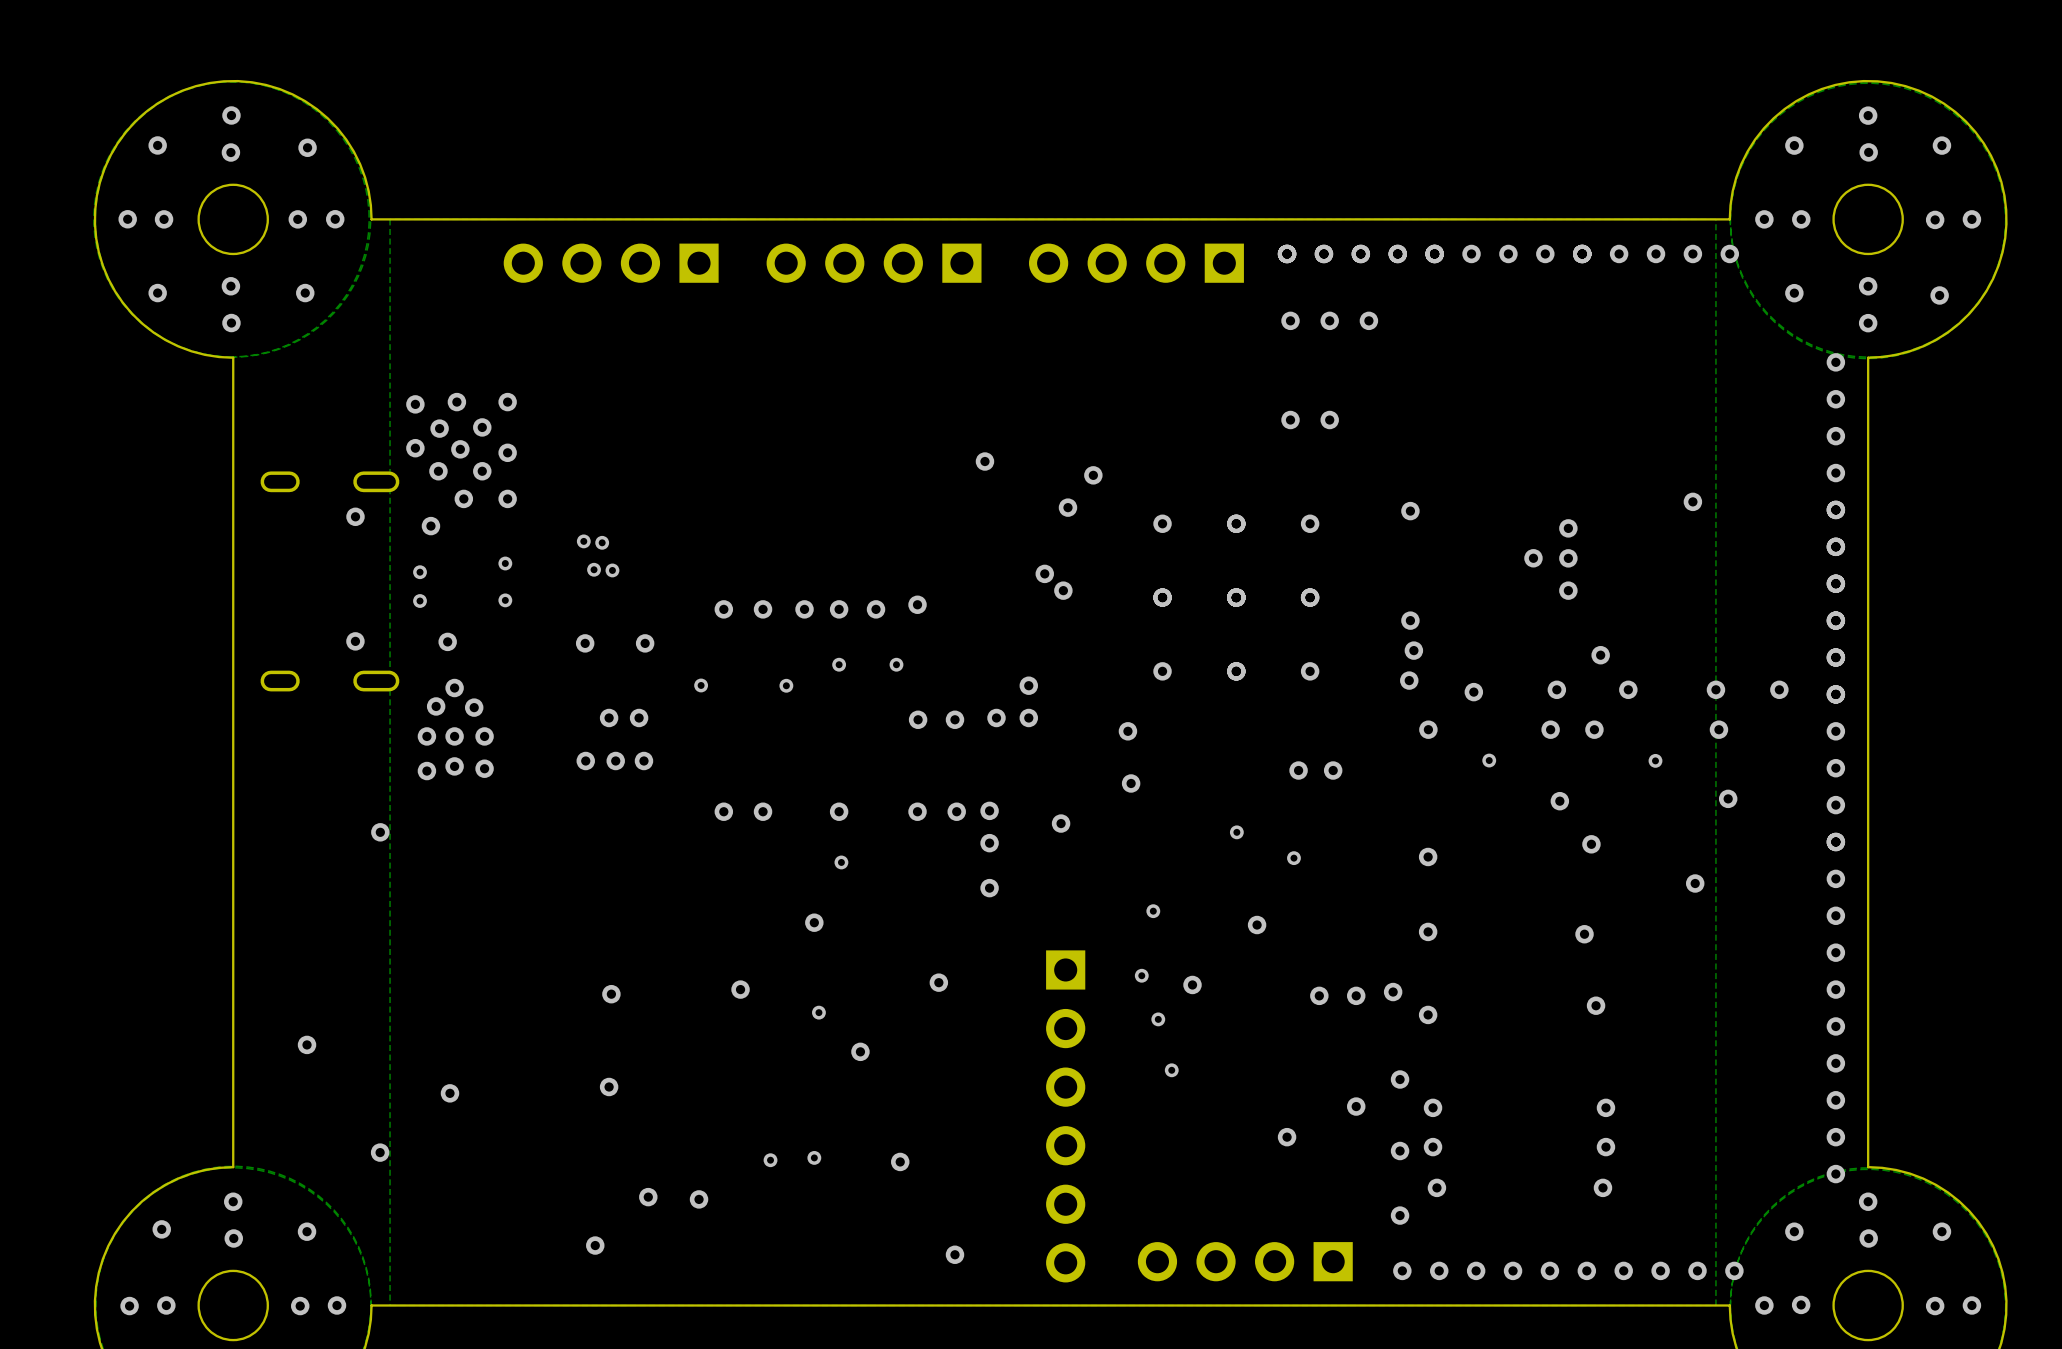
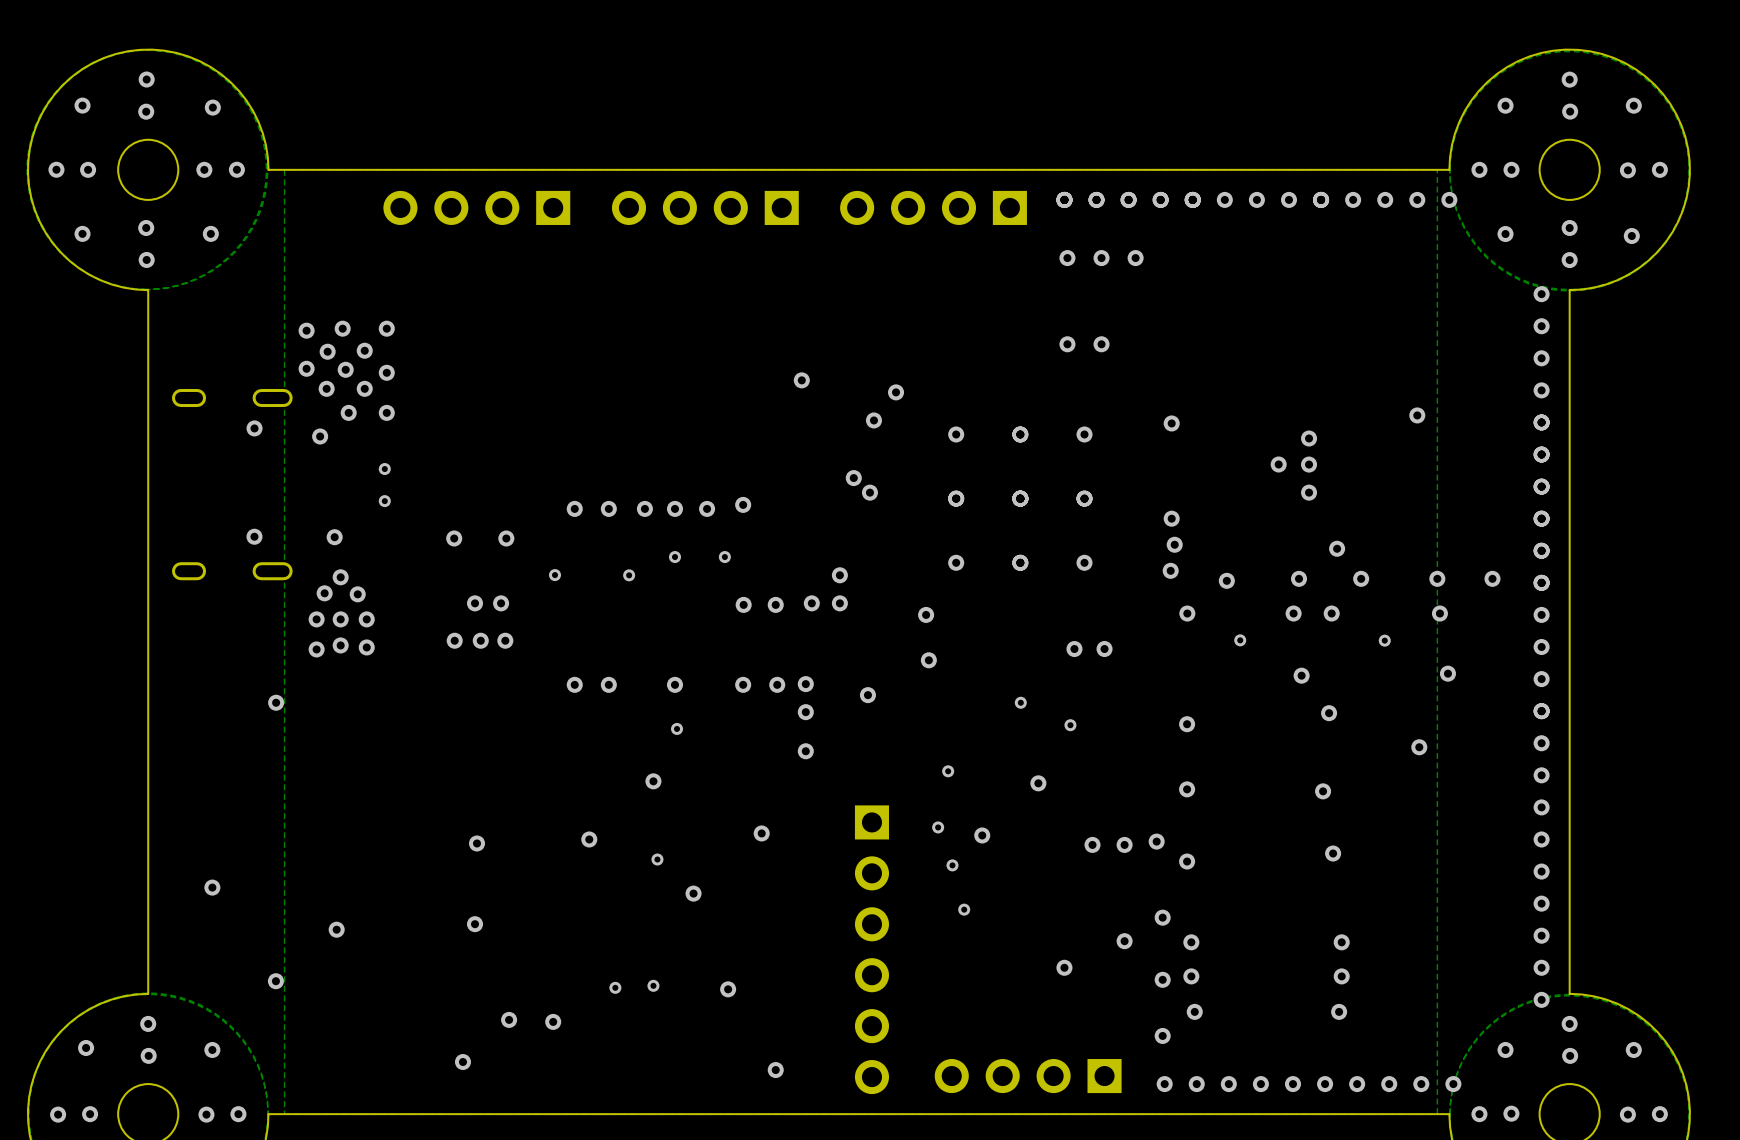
via: (583, 541) -> none
via: (602, 542) -> none
via: (594, 569) -> none
via: (612, 570) -> none
via: (420, 572) -> none
via: (420, 601) -> none

